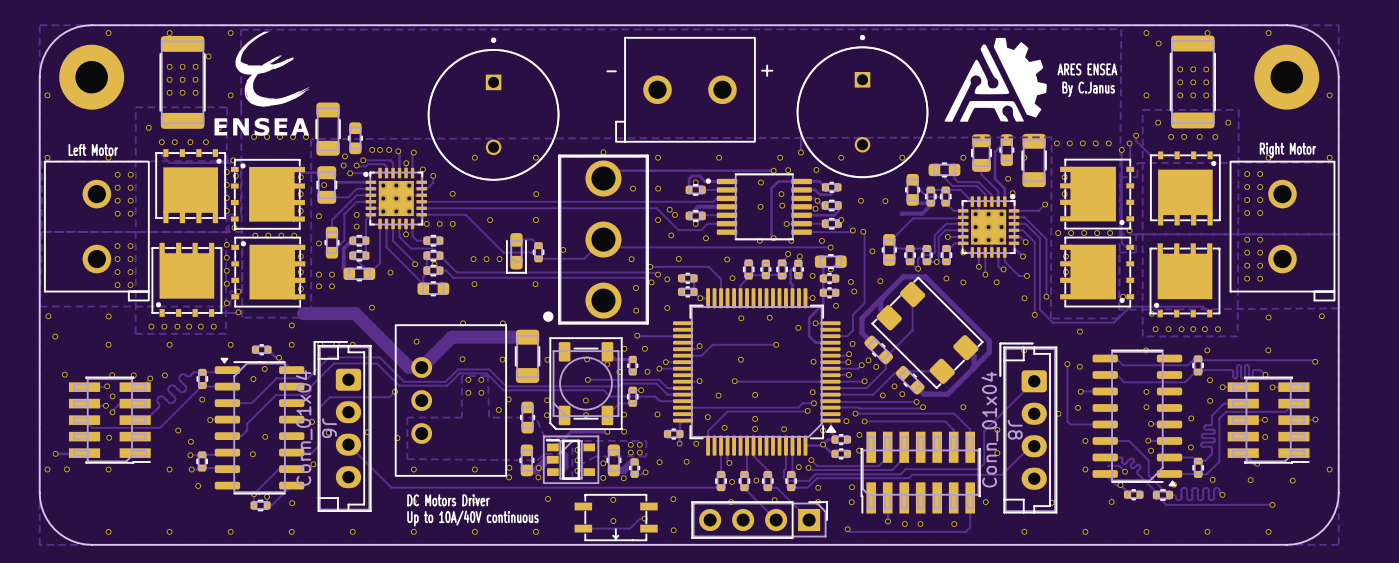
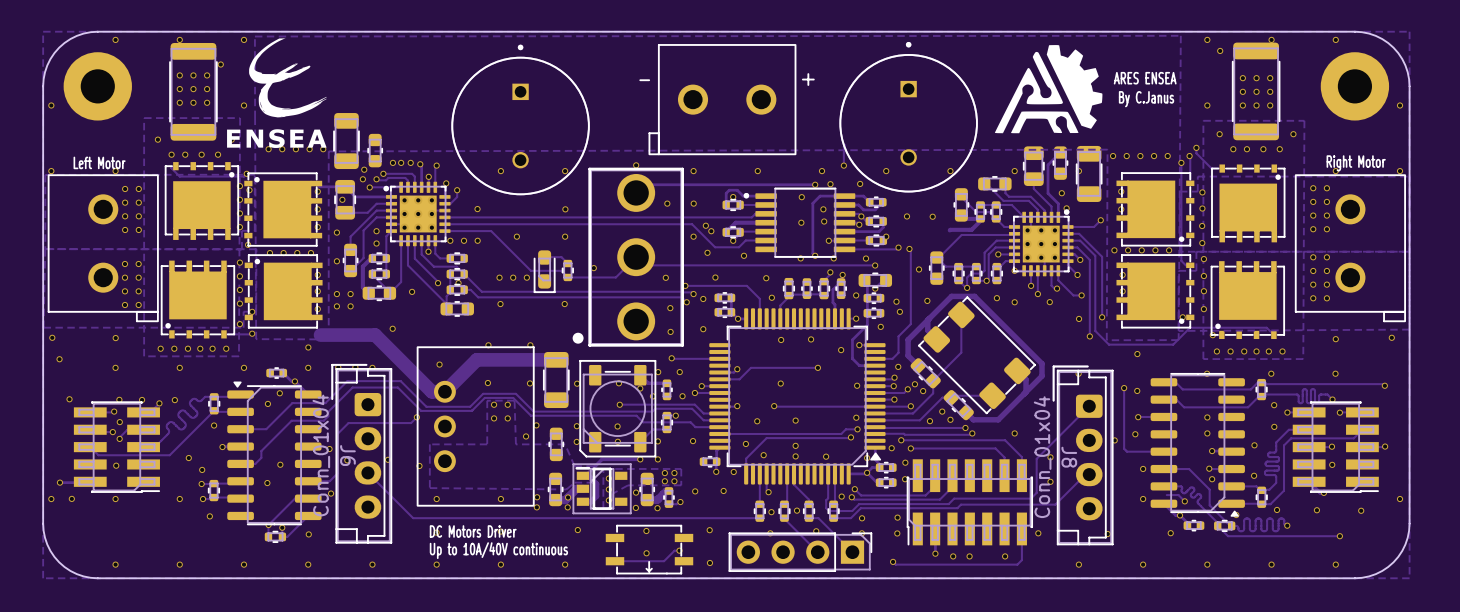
via: none -> (1202, 192)
via: none -> (1202, 208)
via: none -> (1202, 226)
via: none -> (1202, 243)
via: (1129, 230) -> none
via: none -> (1203, 259)
via: none -> (1203, 276)
via: none -> (1203, 291)
via: none -> (1203, 309)

